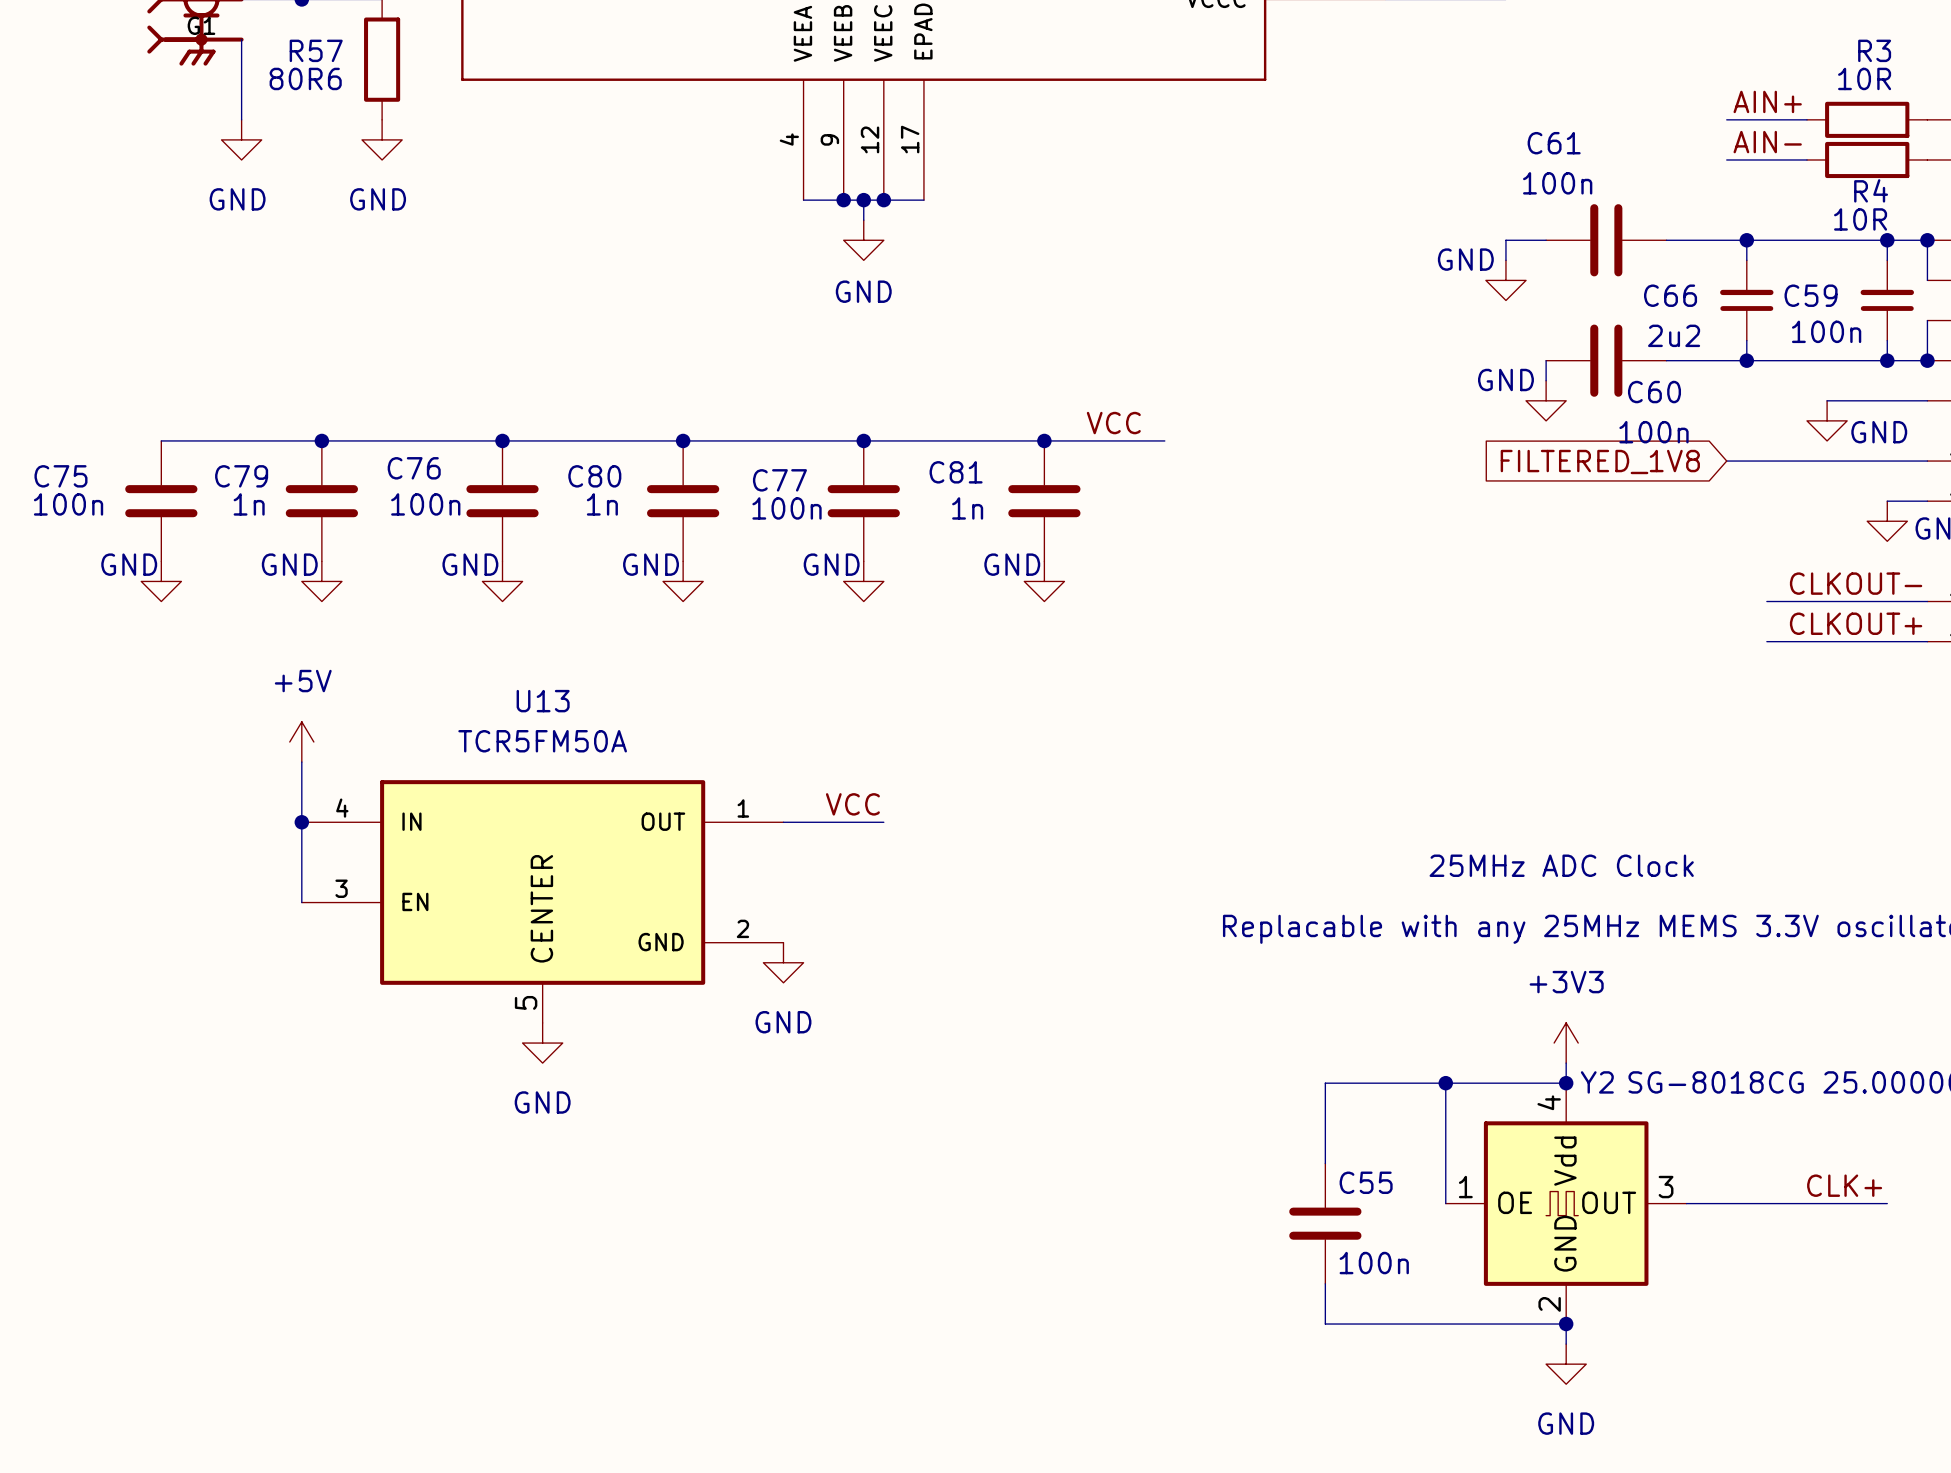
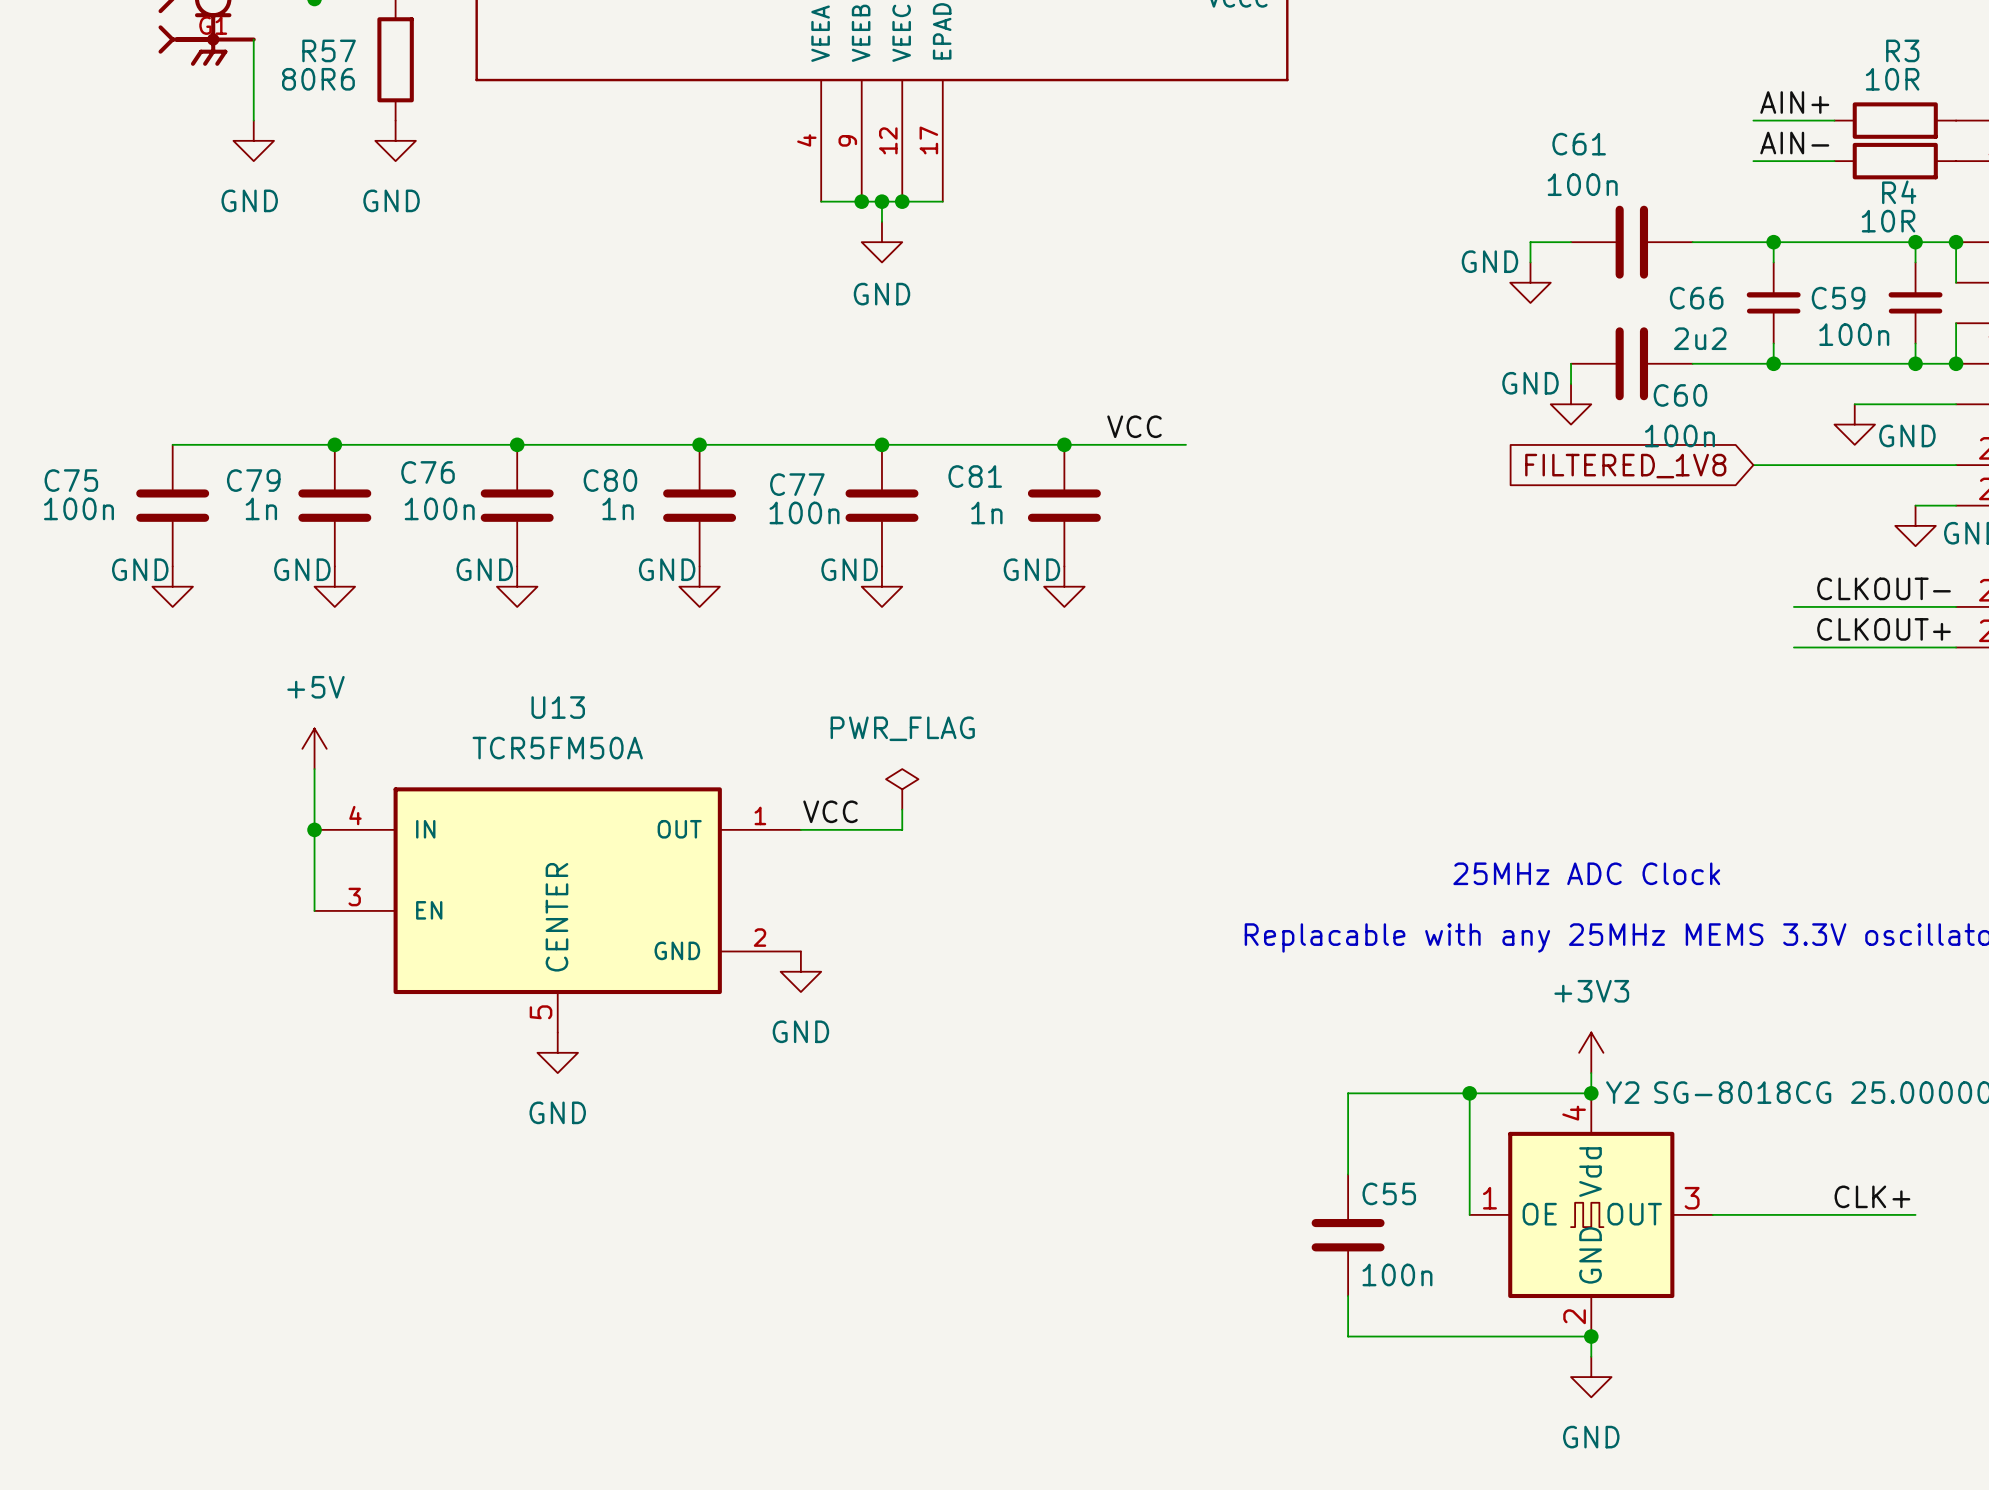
power symbol: none -> PWR_FLAG (902, 789)
wire: none -> (902, 809) (902, 829)
label position: VCC (852, 804) -> VCC (830, 811)

